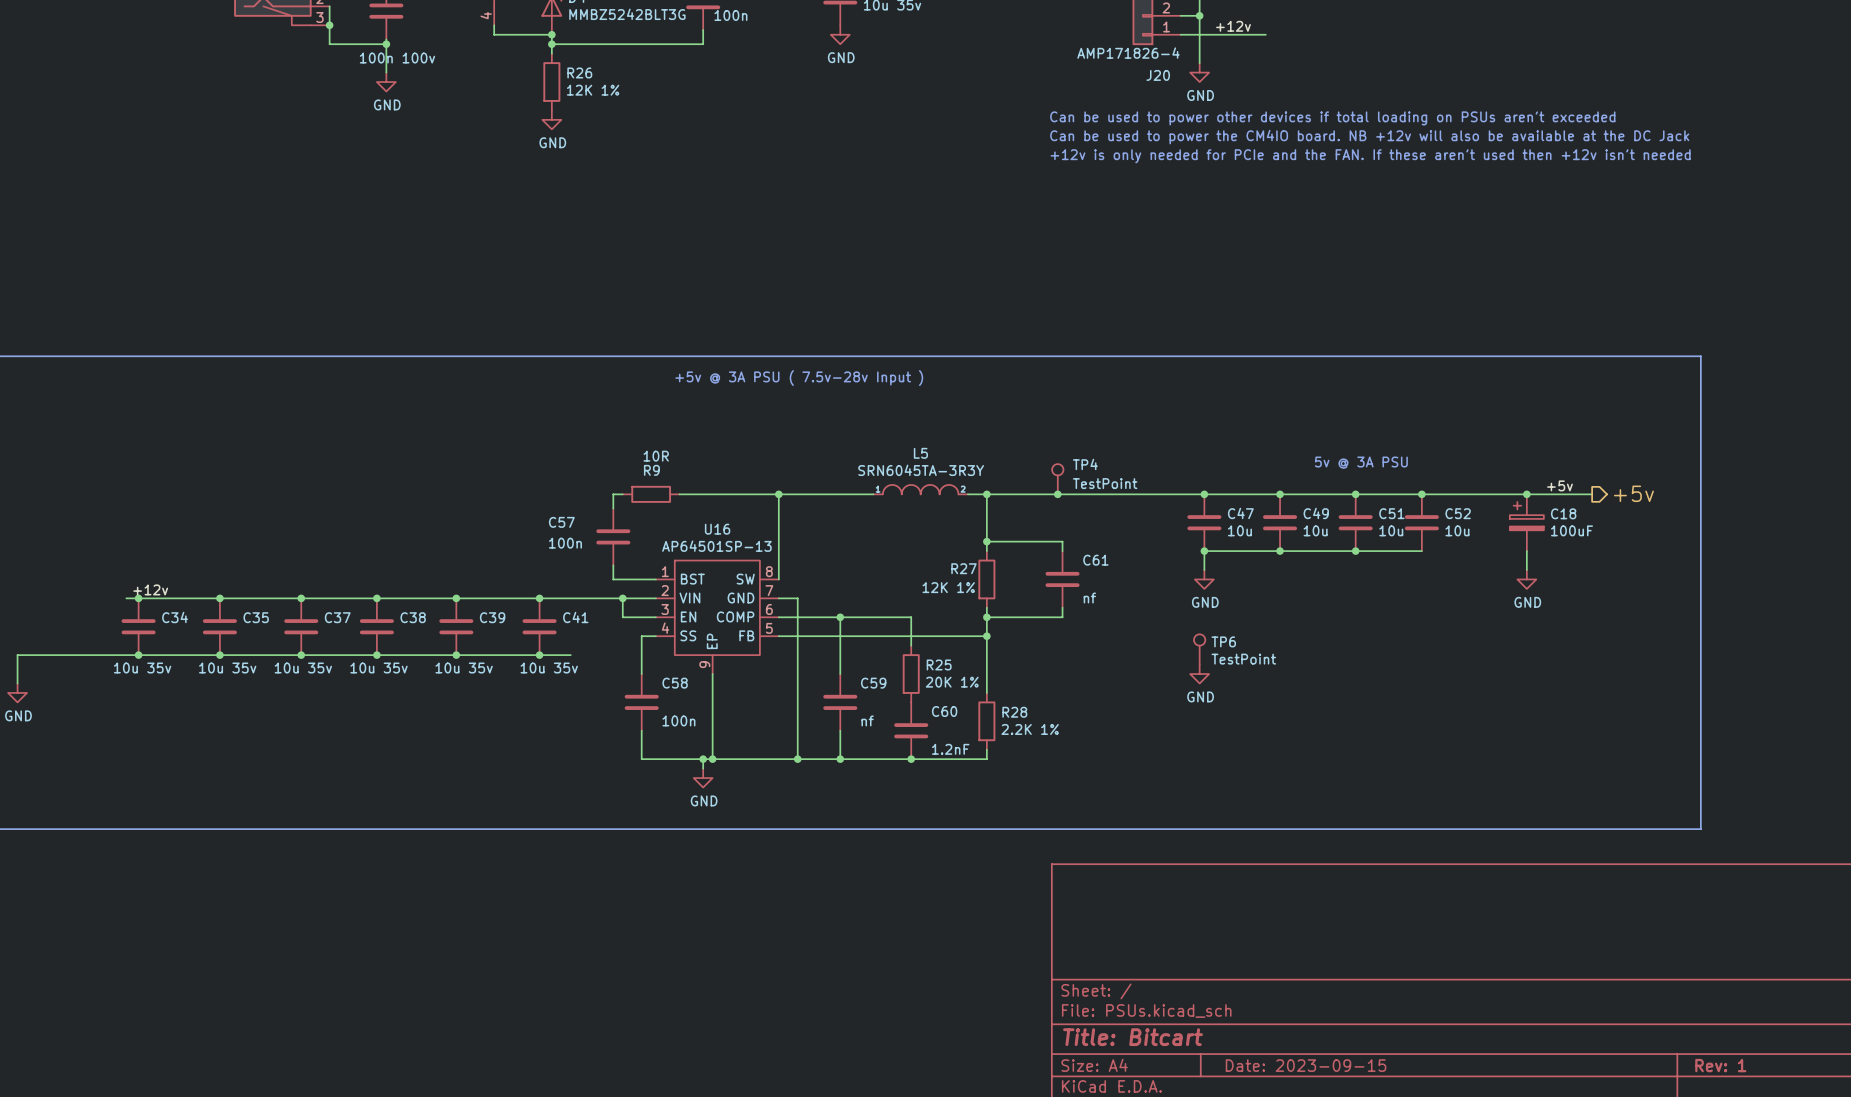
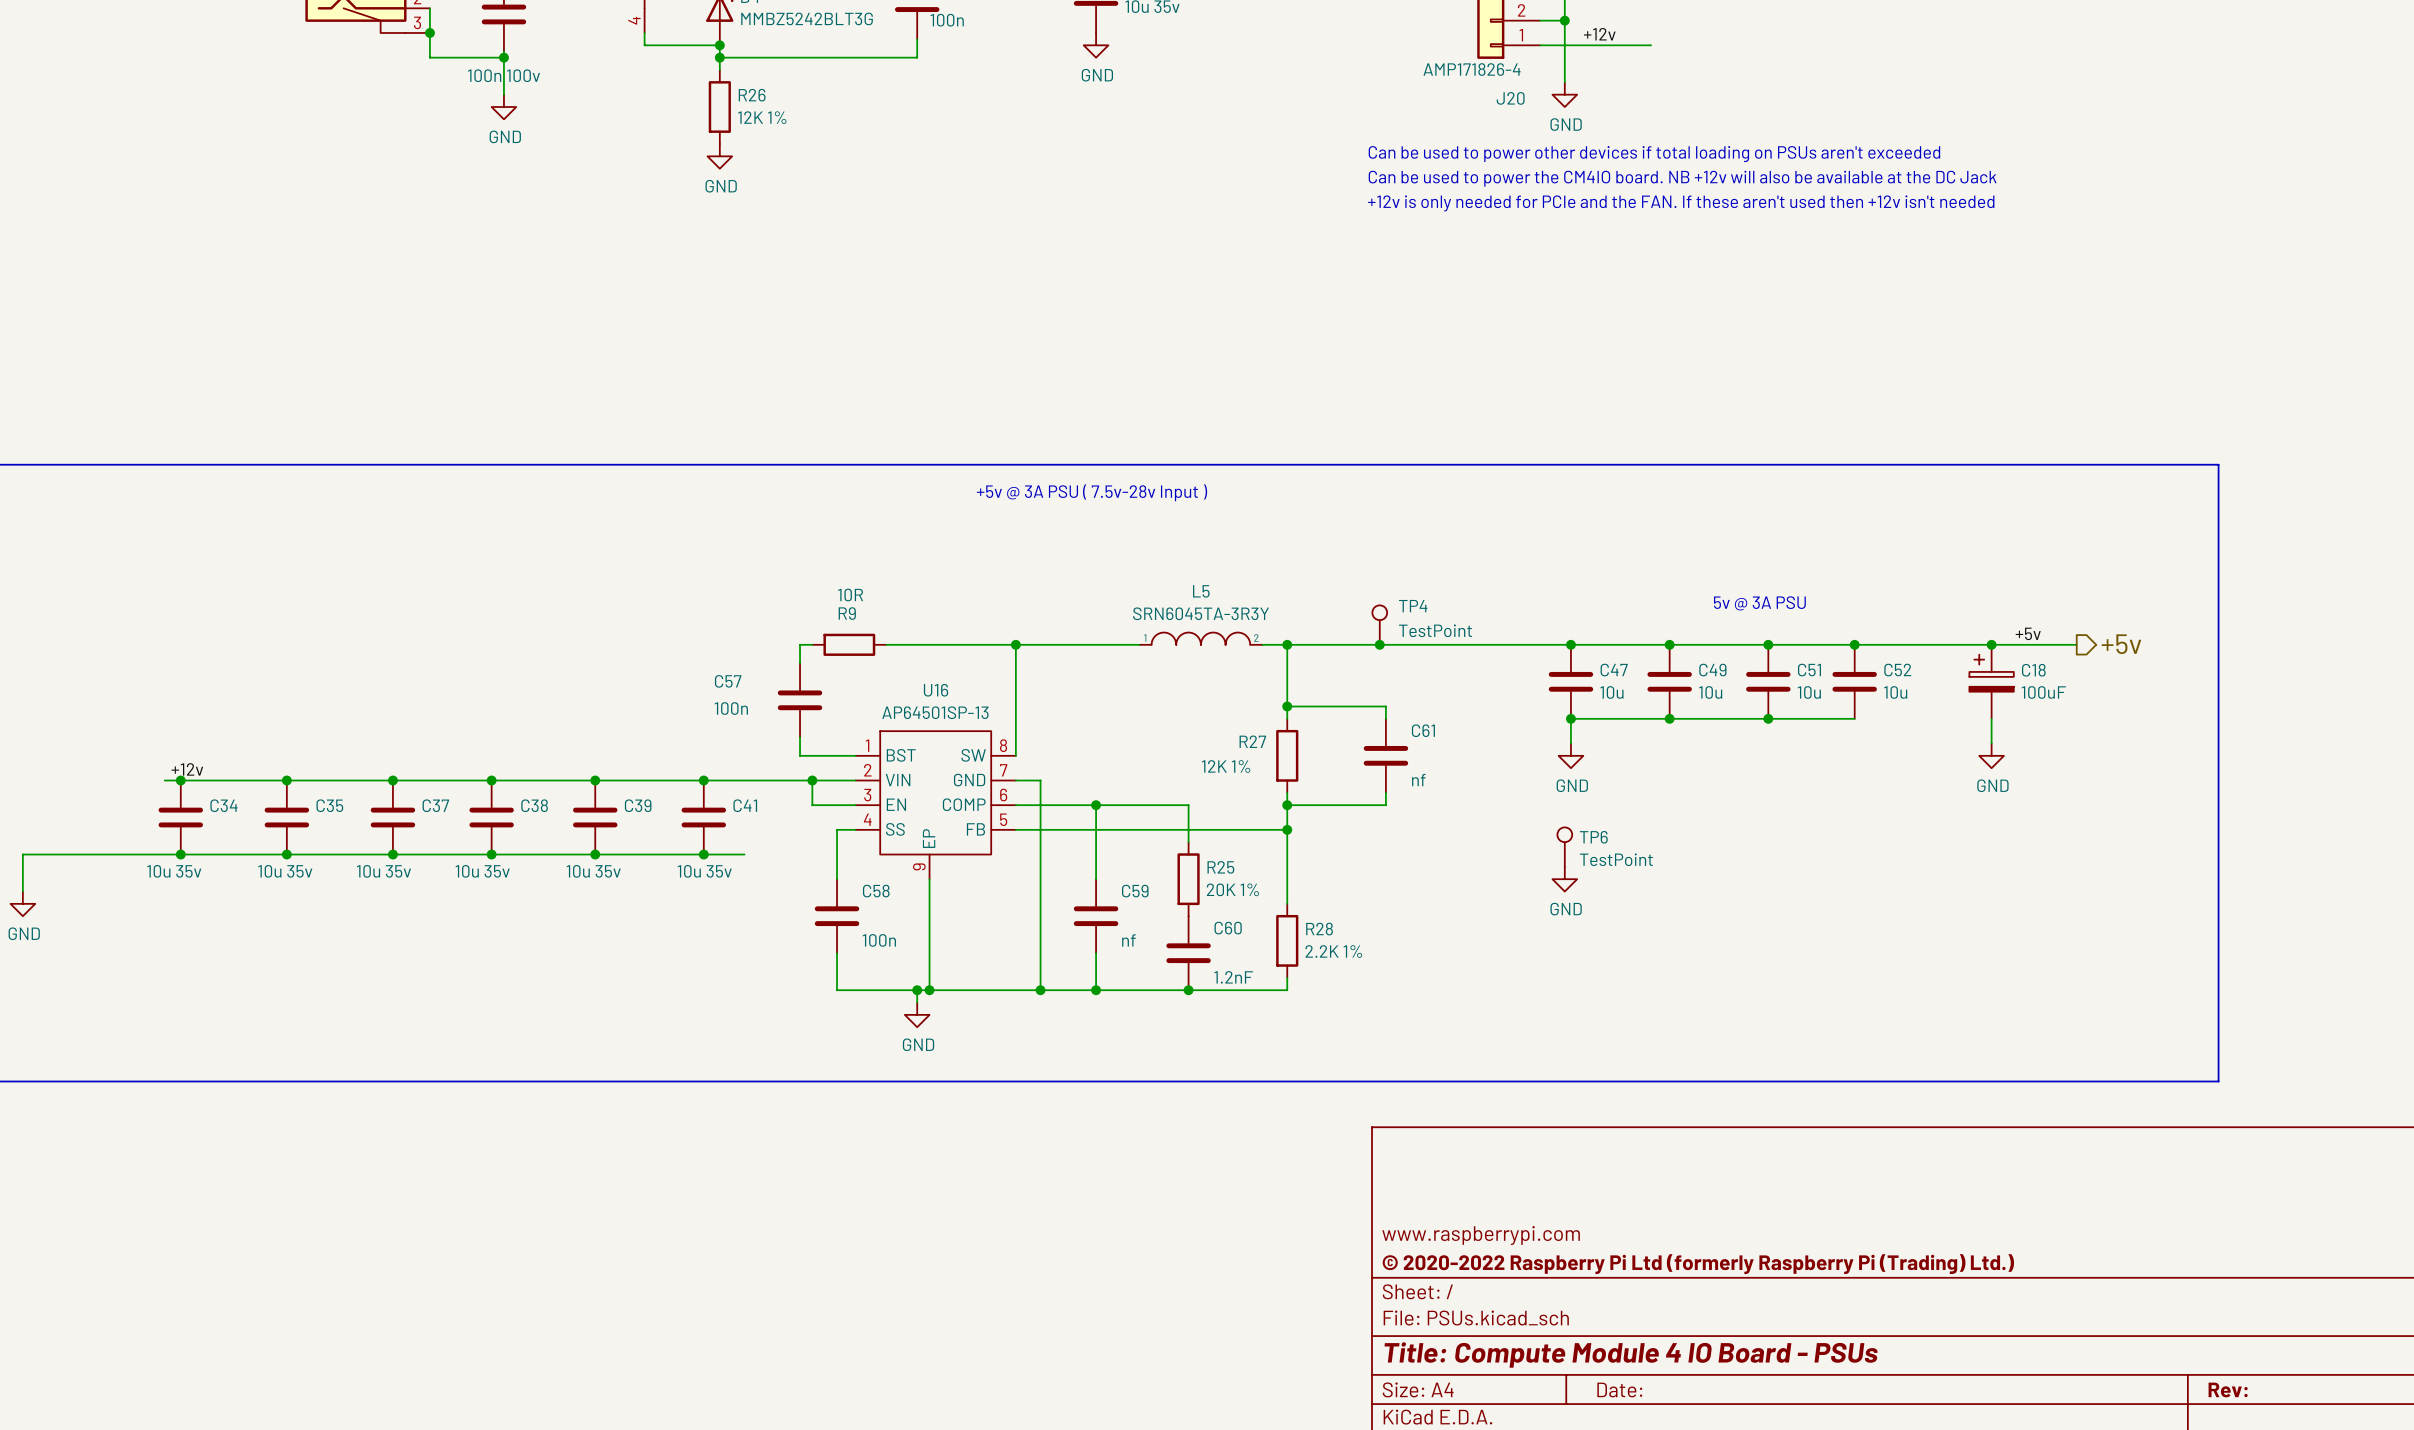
title block: none -> www.raspberrypi.com (1481, 1235)
title block: none -> © 2020-2022 Raspberry Pi Ltd (formerly Raspberry Pi (Trading) Ltd.) (1698, 1264)
title block: Title: Bitcart (1133, 1037) -> Title: Compute Module 4 IO Board - PSUs (1631, 1354)
title block: Date: 2023-09-15 (1306, 1065) -> Date: (1619, 1390)
title block: Rev: 1 (1720, 1065) -> Rev: (2228, 1389)

